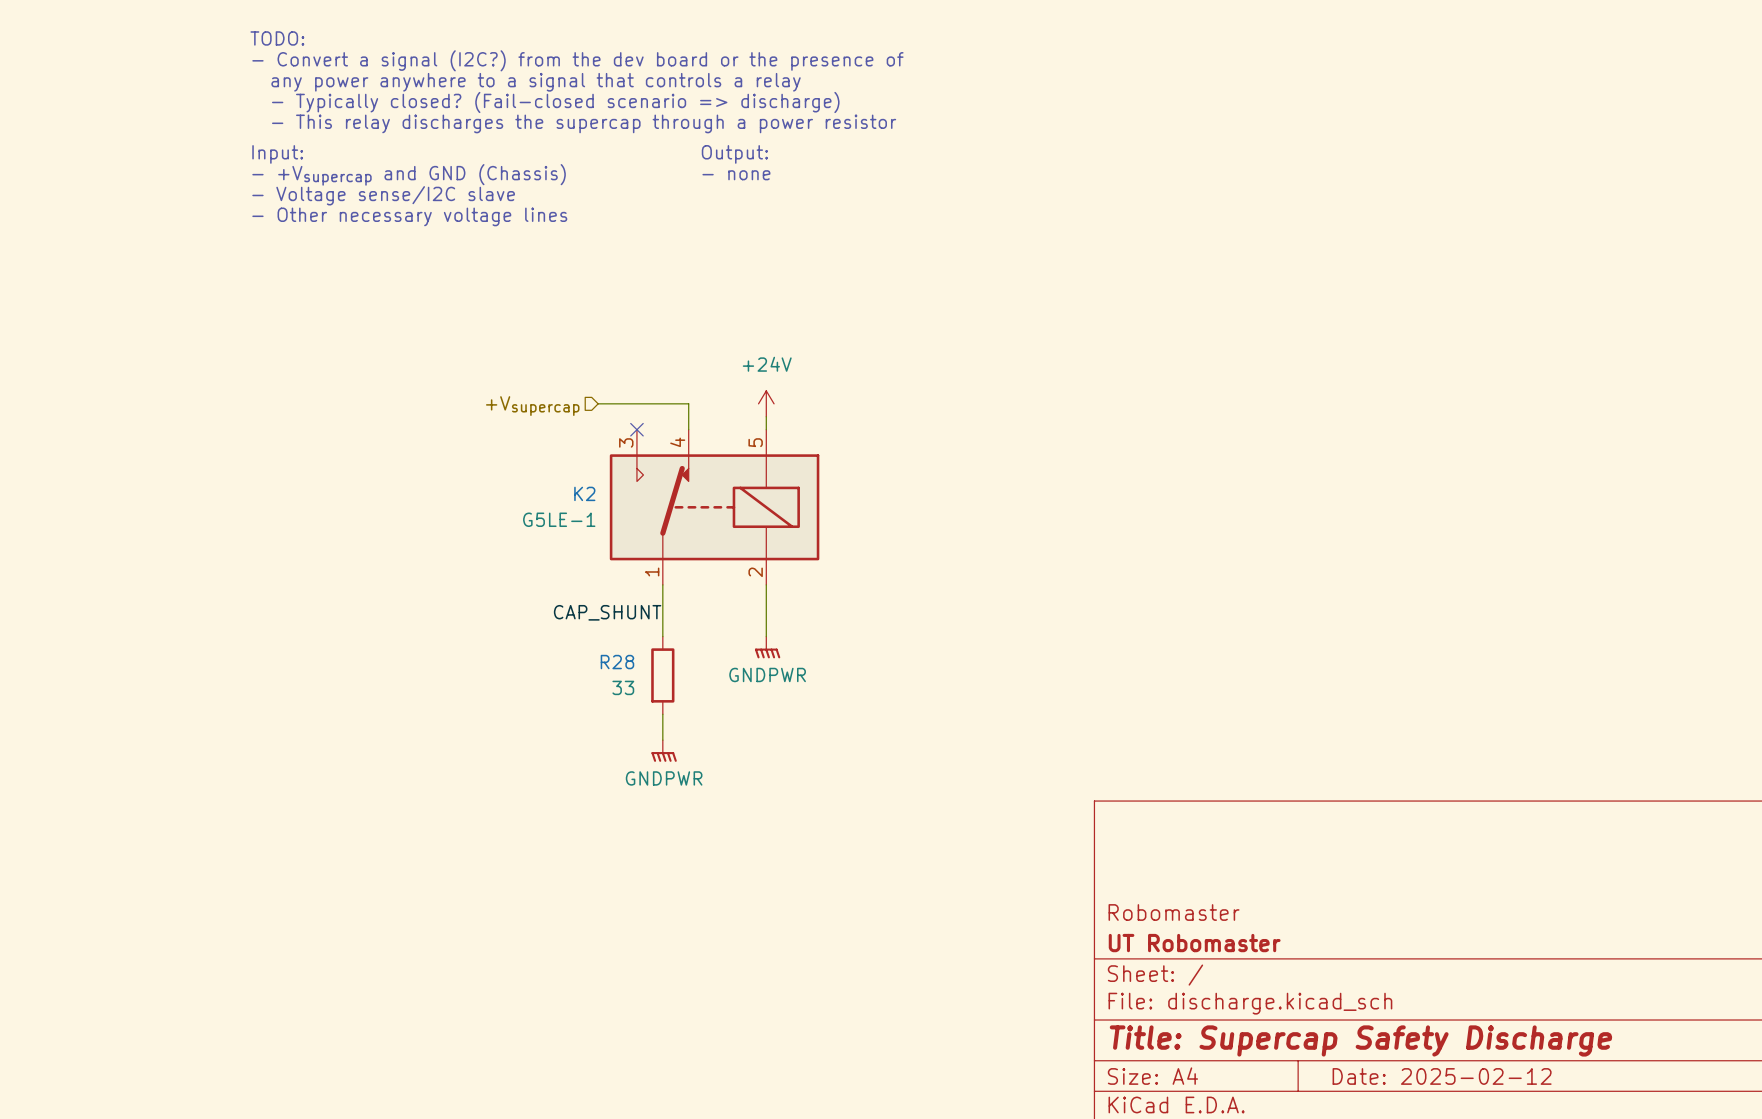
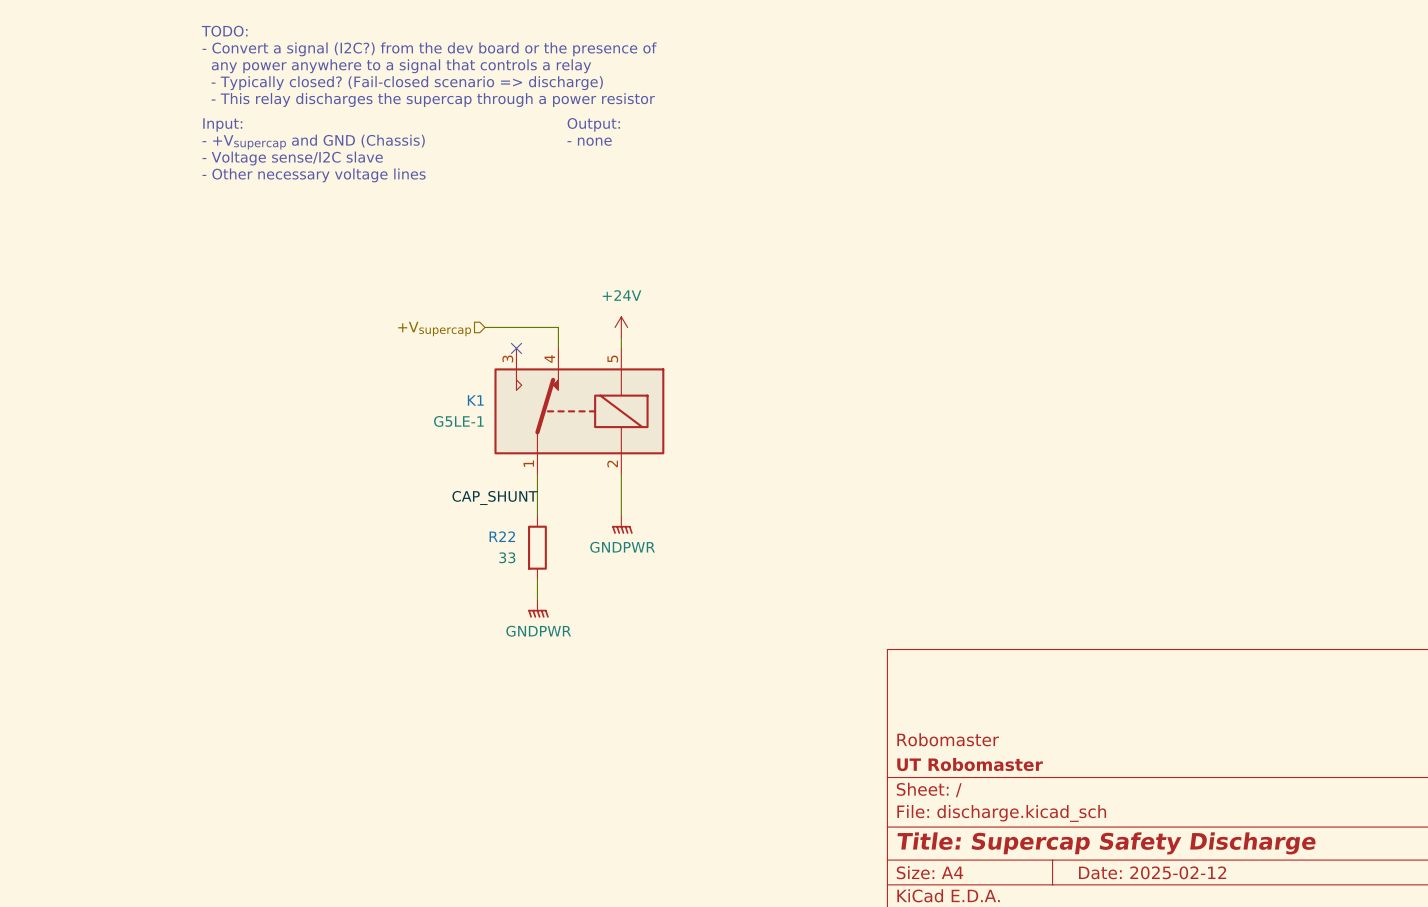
K2 name: K2 (584, 493) -> K1 (475, 400)
R28 name: R28 (617, 662) -> R22 (502, 536)

